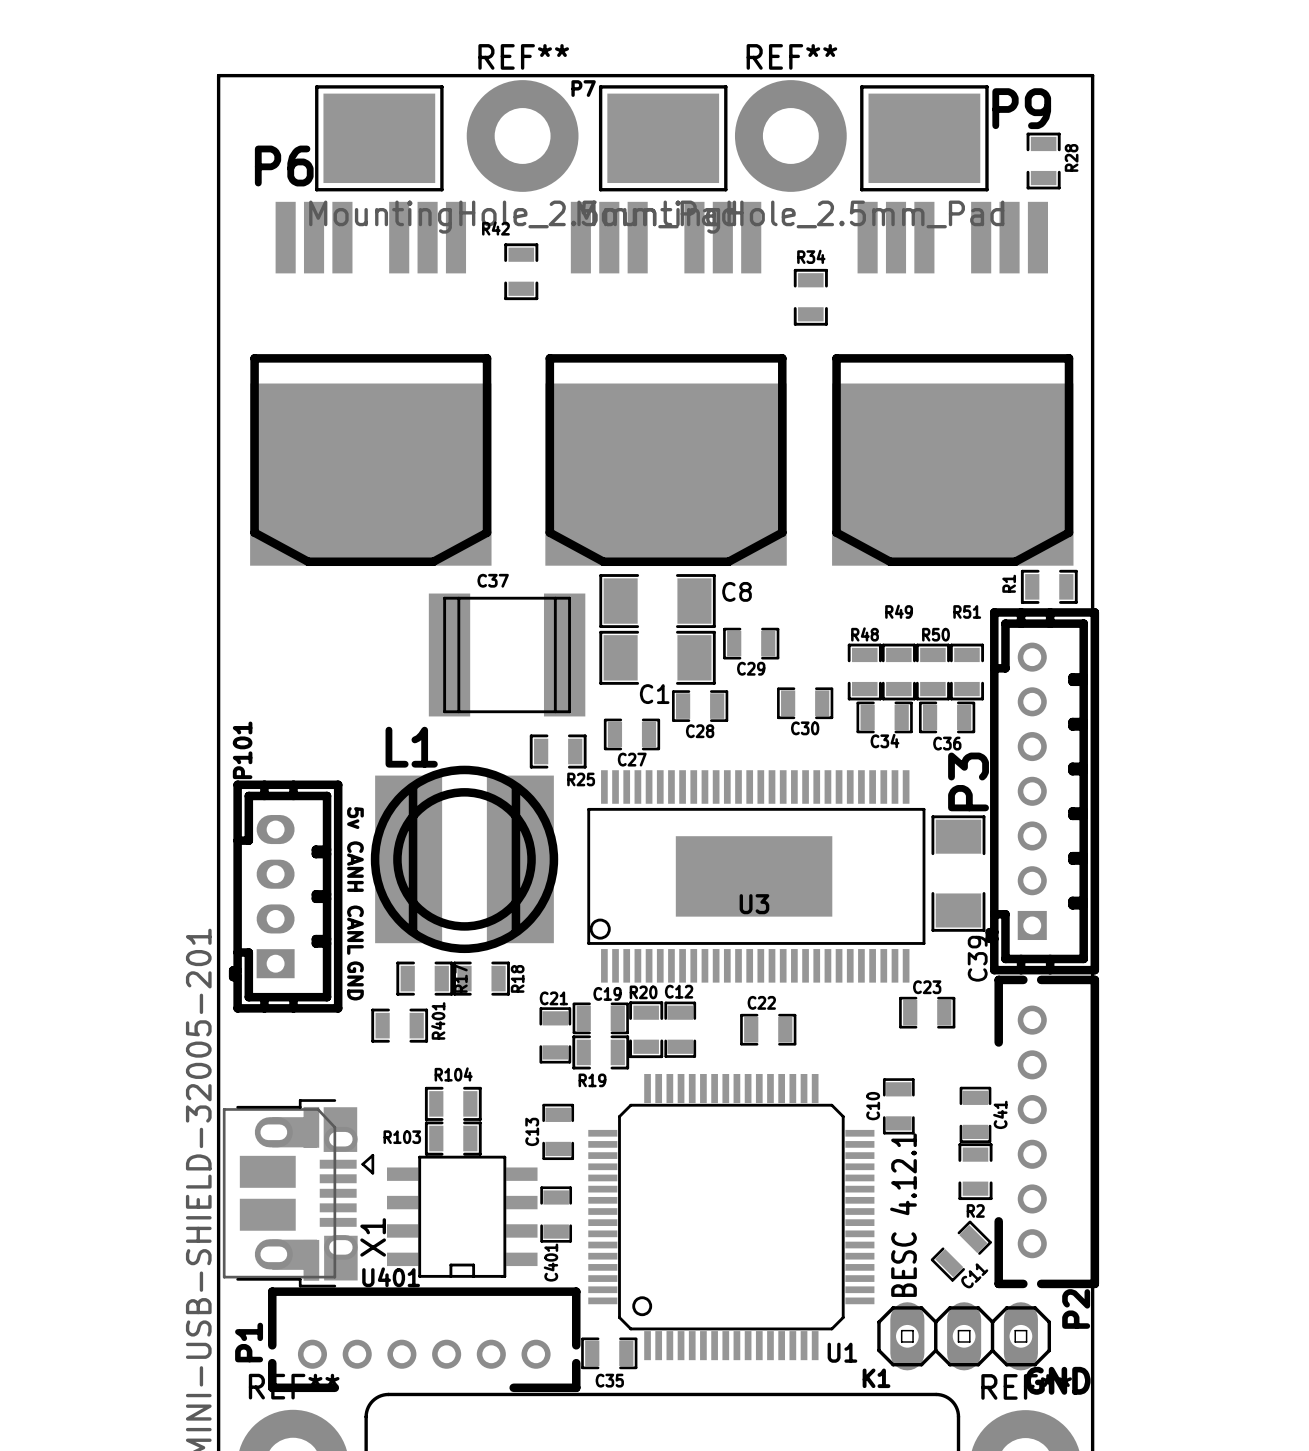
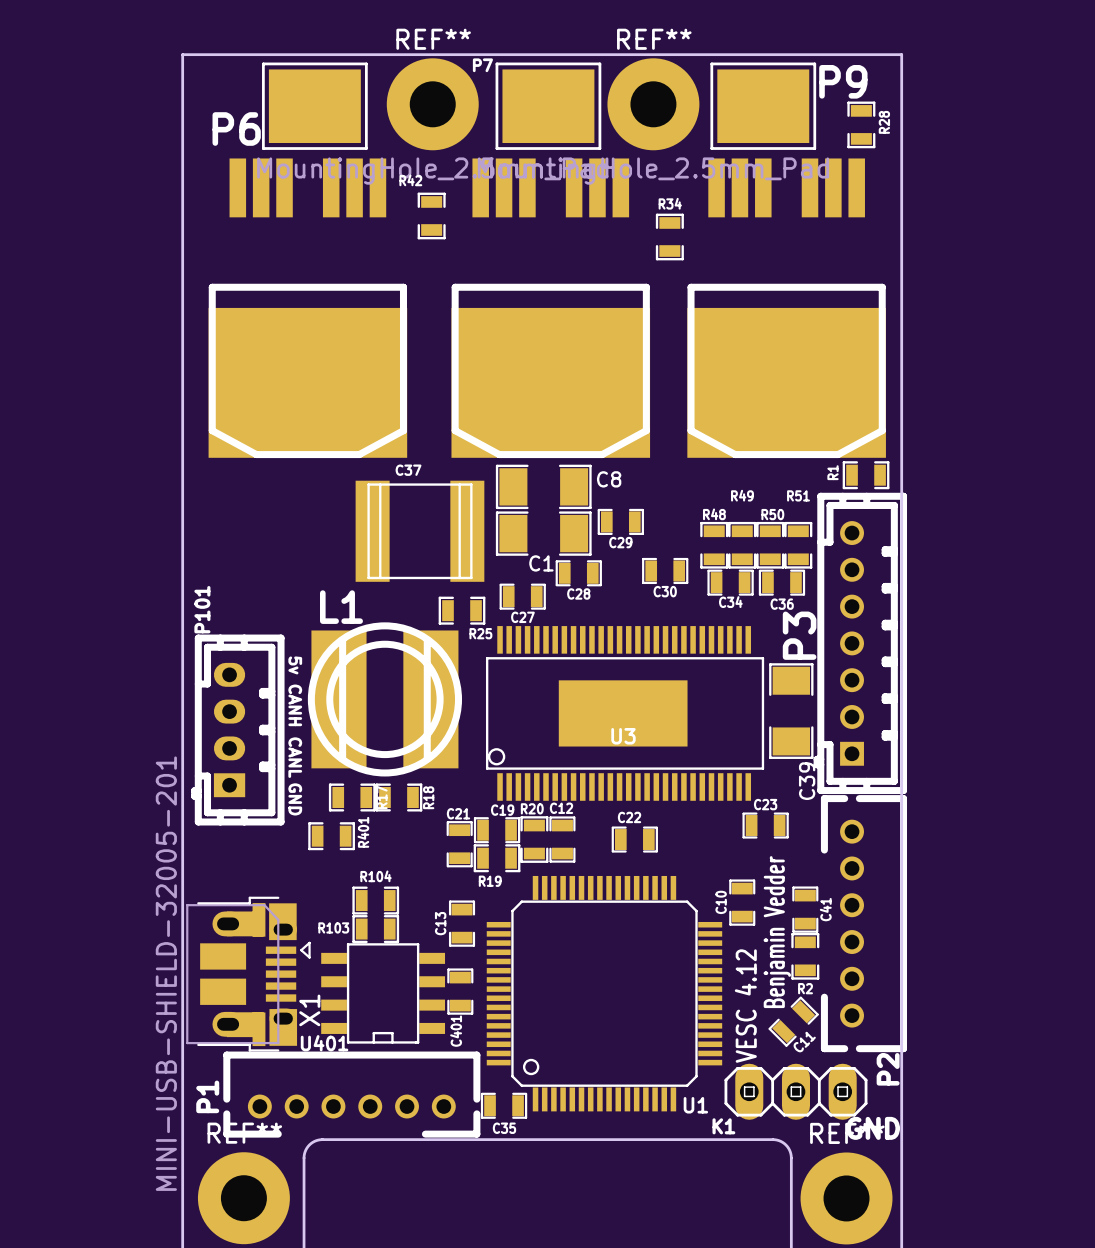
text: none -> Benjamin Vedder (777, 932)
text: BESC 4.12.1 (903, 1215) -> VESC 4.12 (745, 1006)

